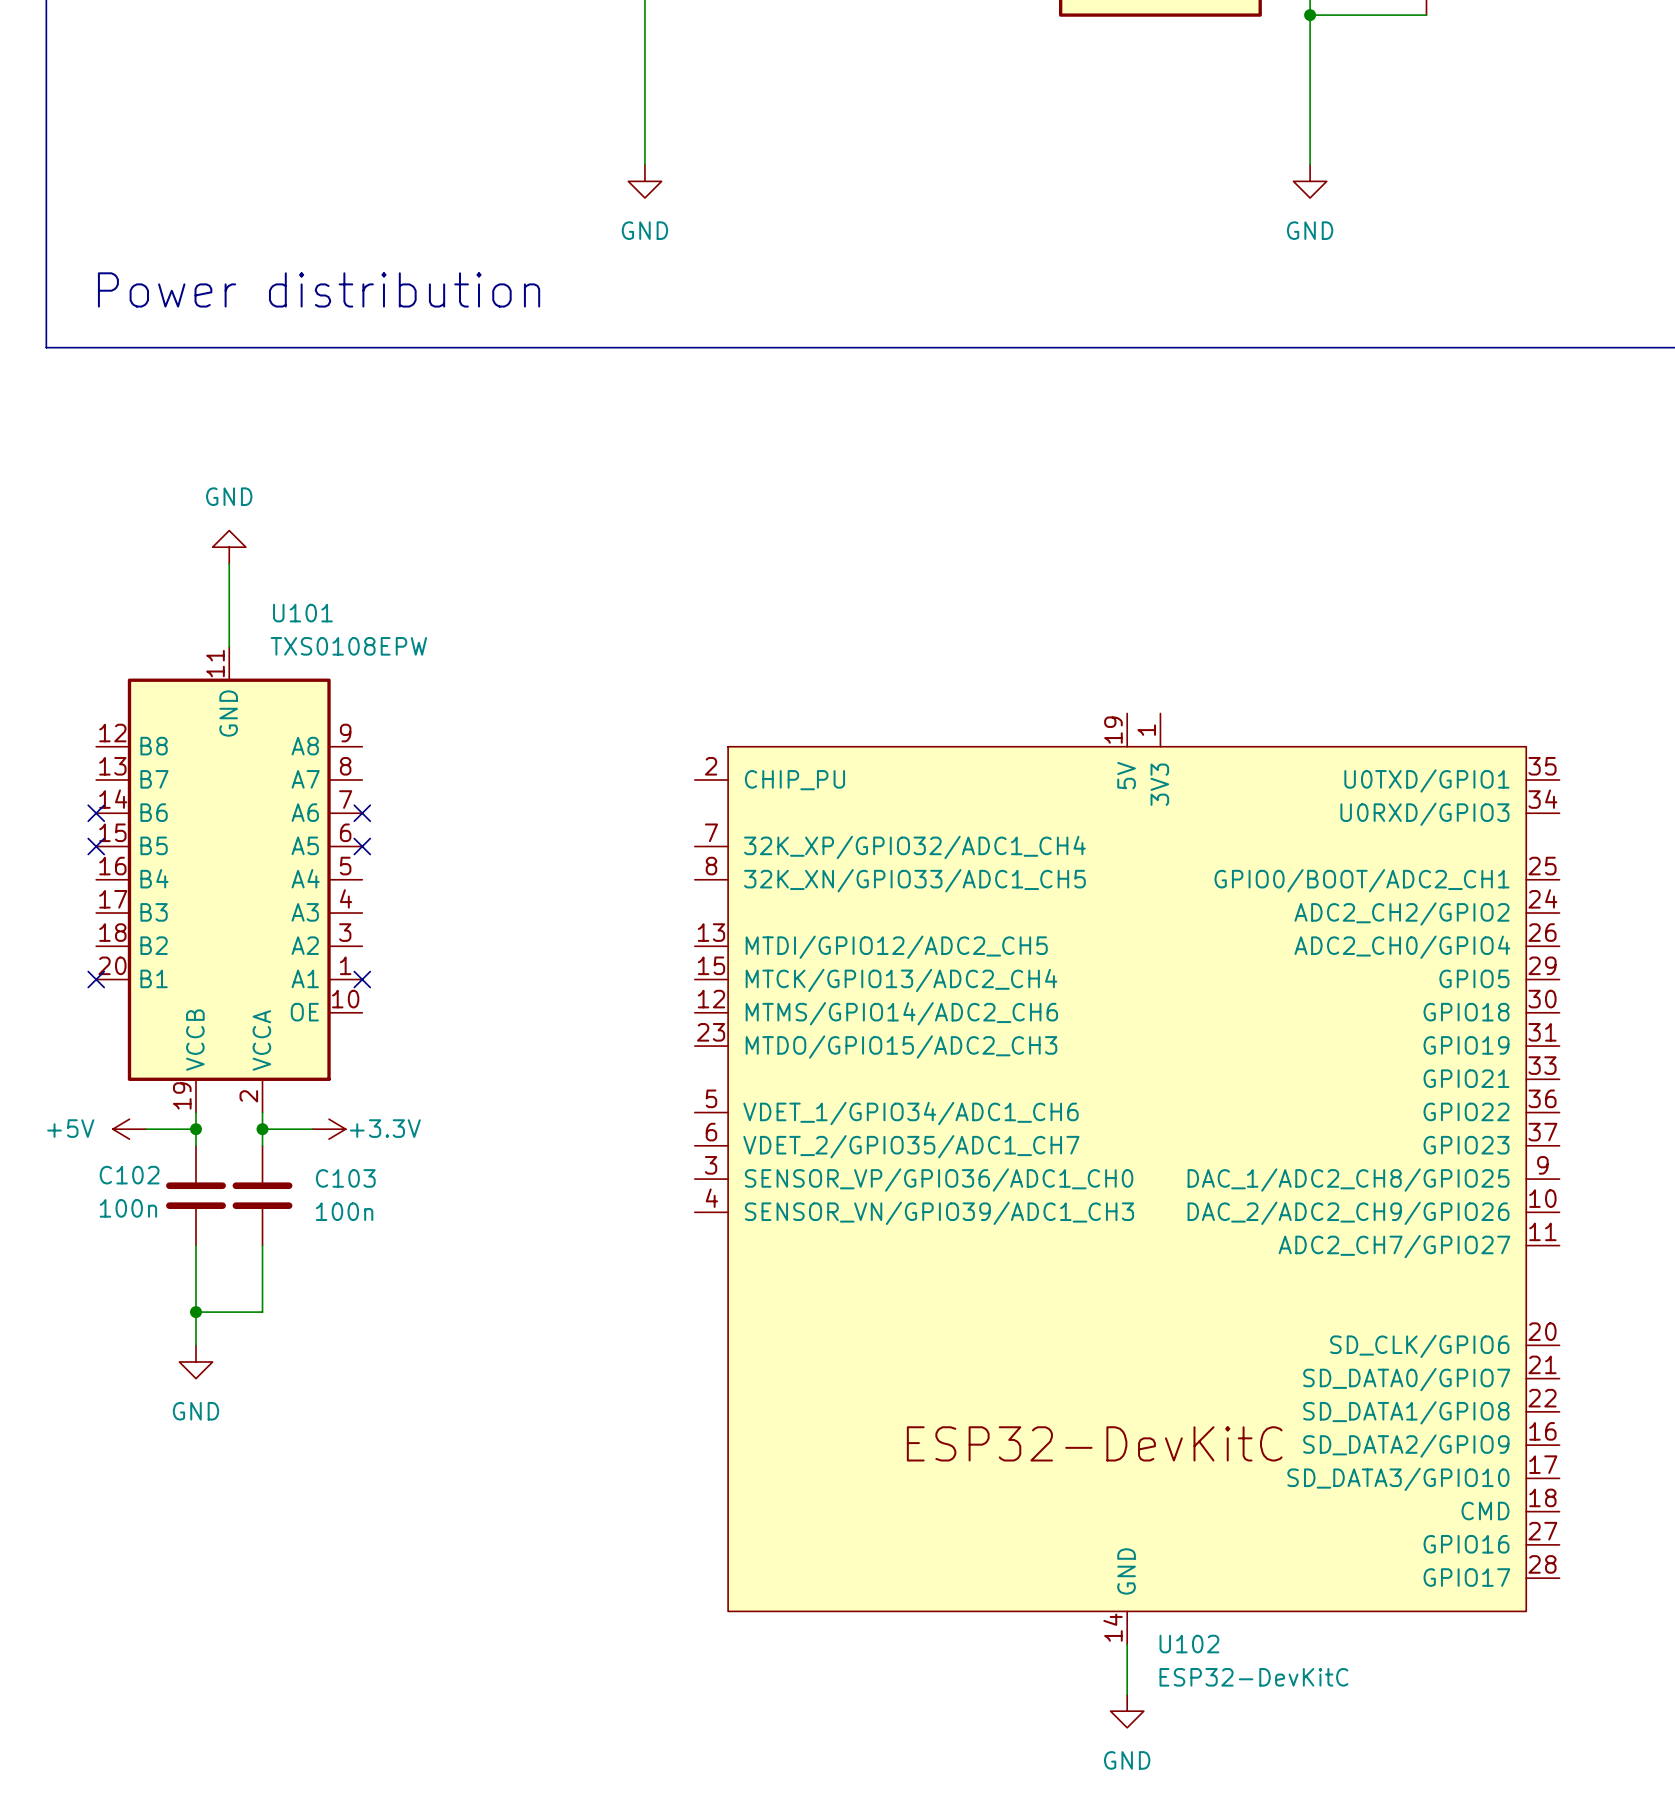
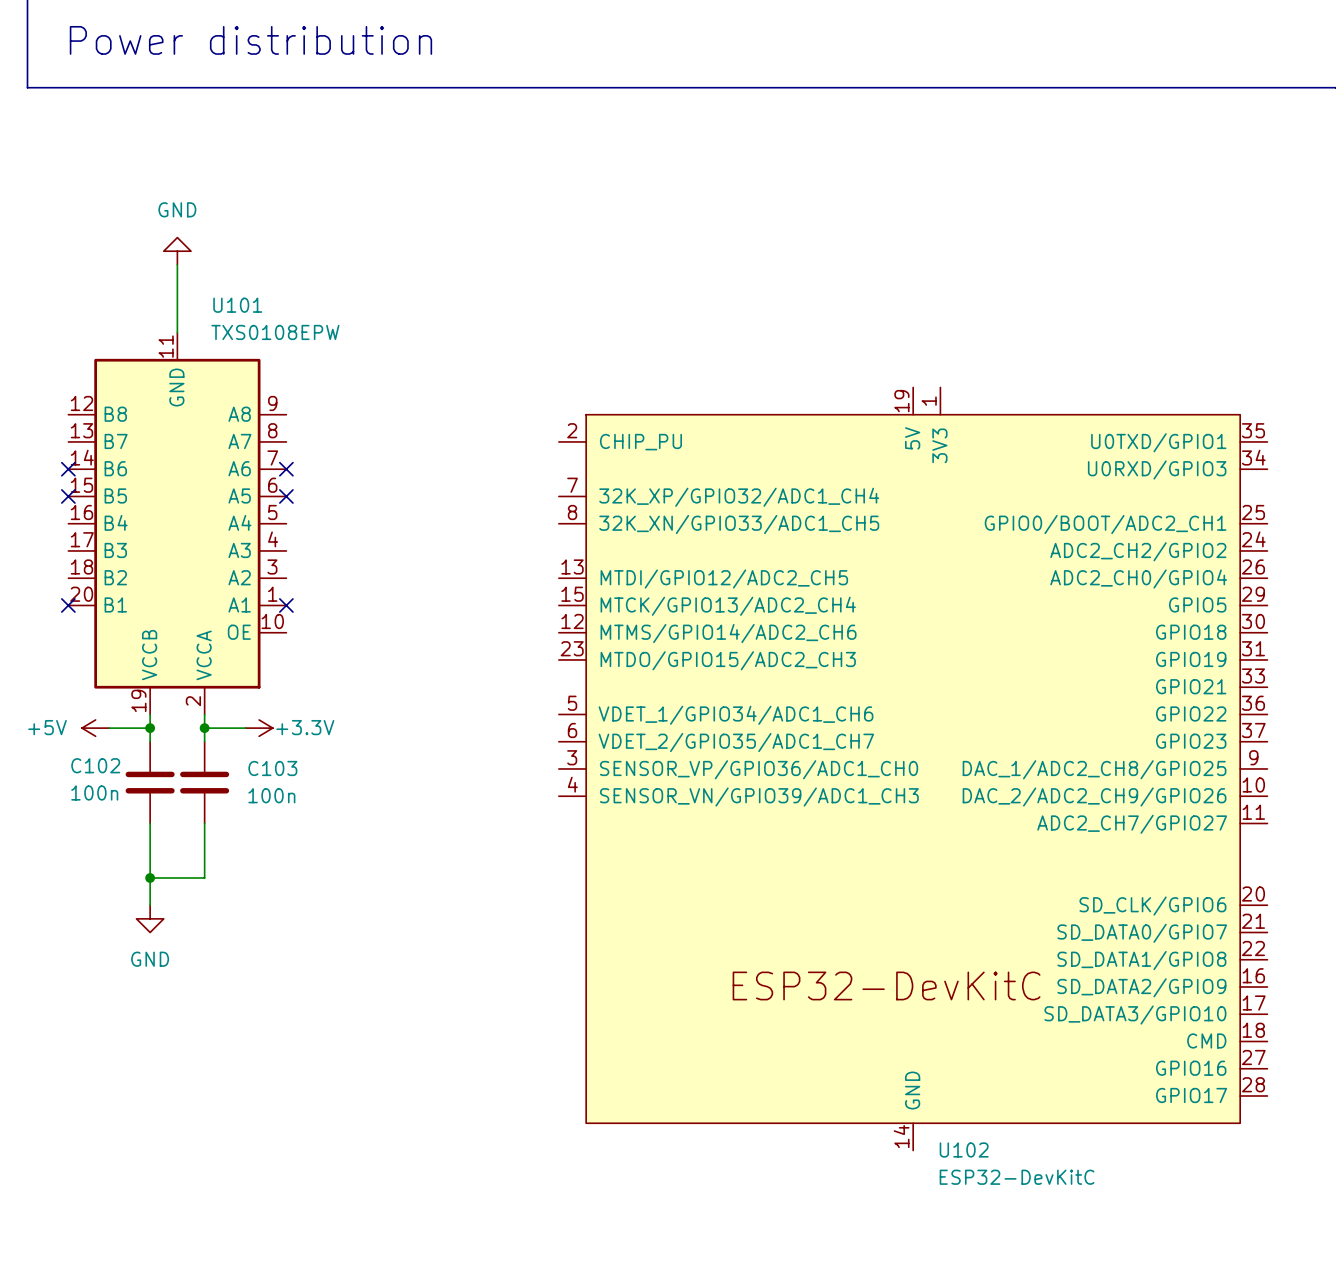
wire: (1127, 1644) (1127, 1694) -> none
power symbol: GND (1127, 1711) -> none

